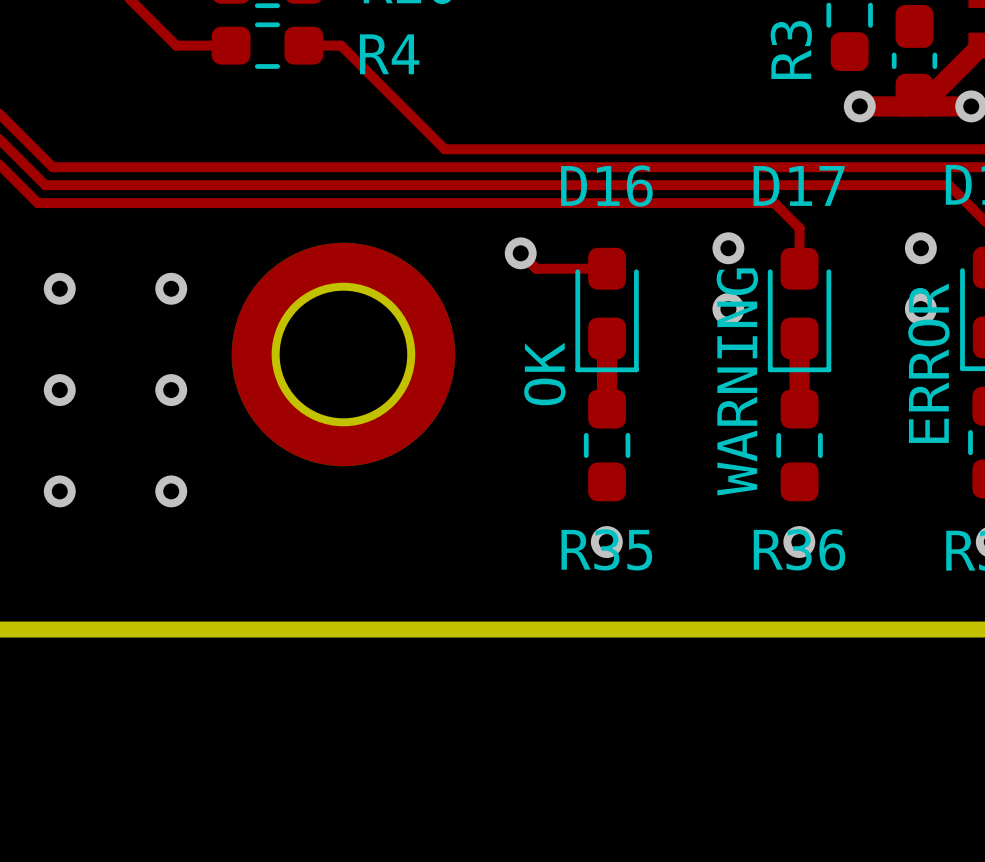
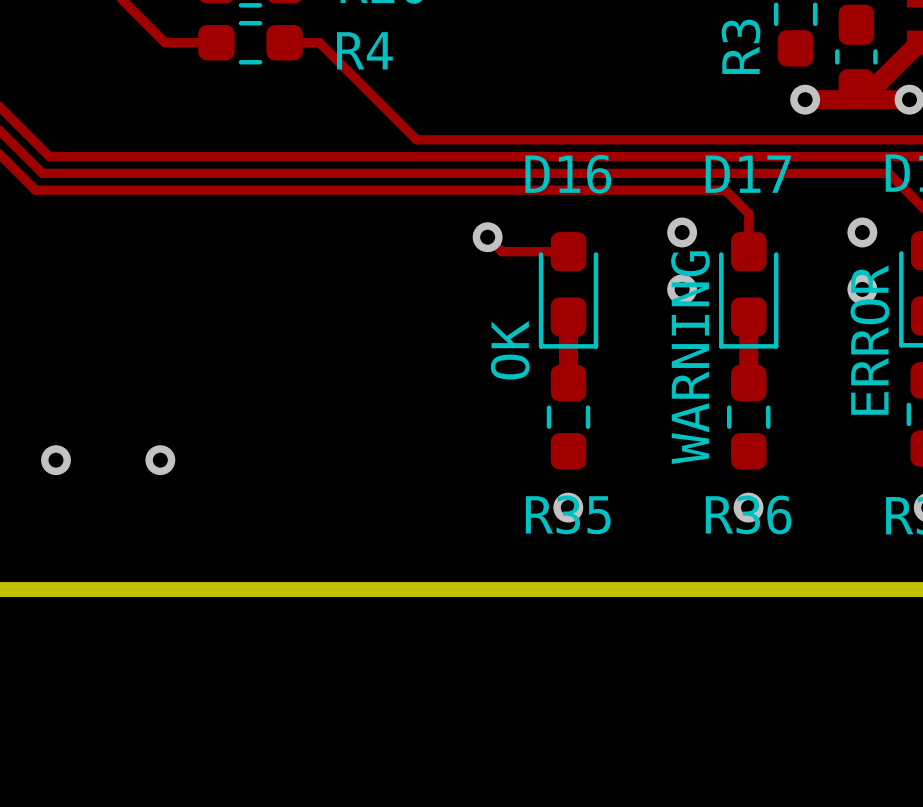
via: (59, 288) -> none
via: (171, 288) -> none
part: (343, 354) -> none
via: (59, 390) -> none
via: (171, 390) -> none

